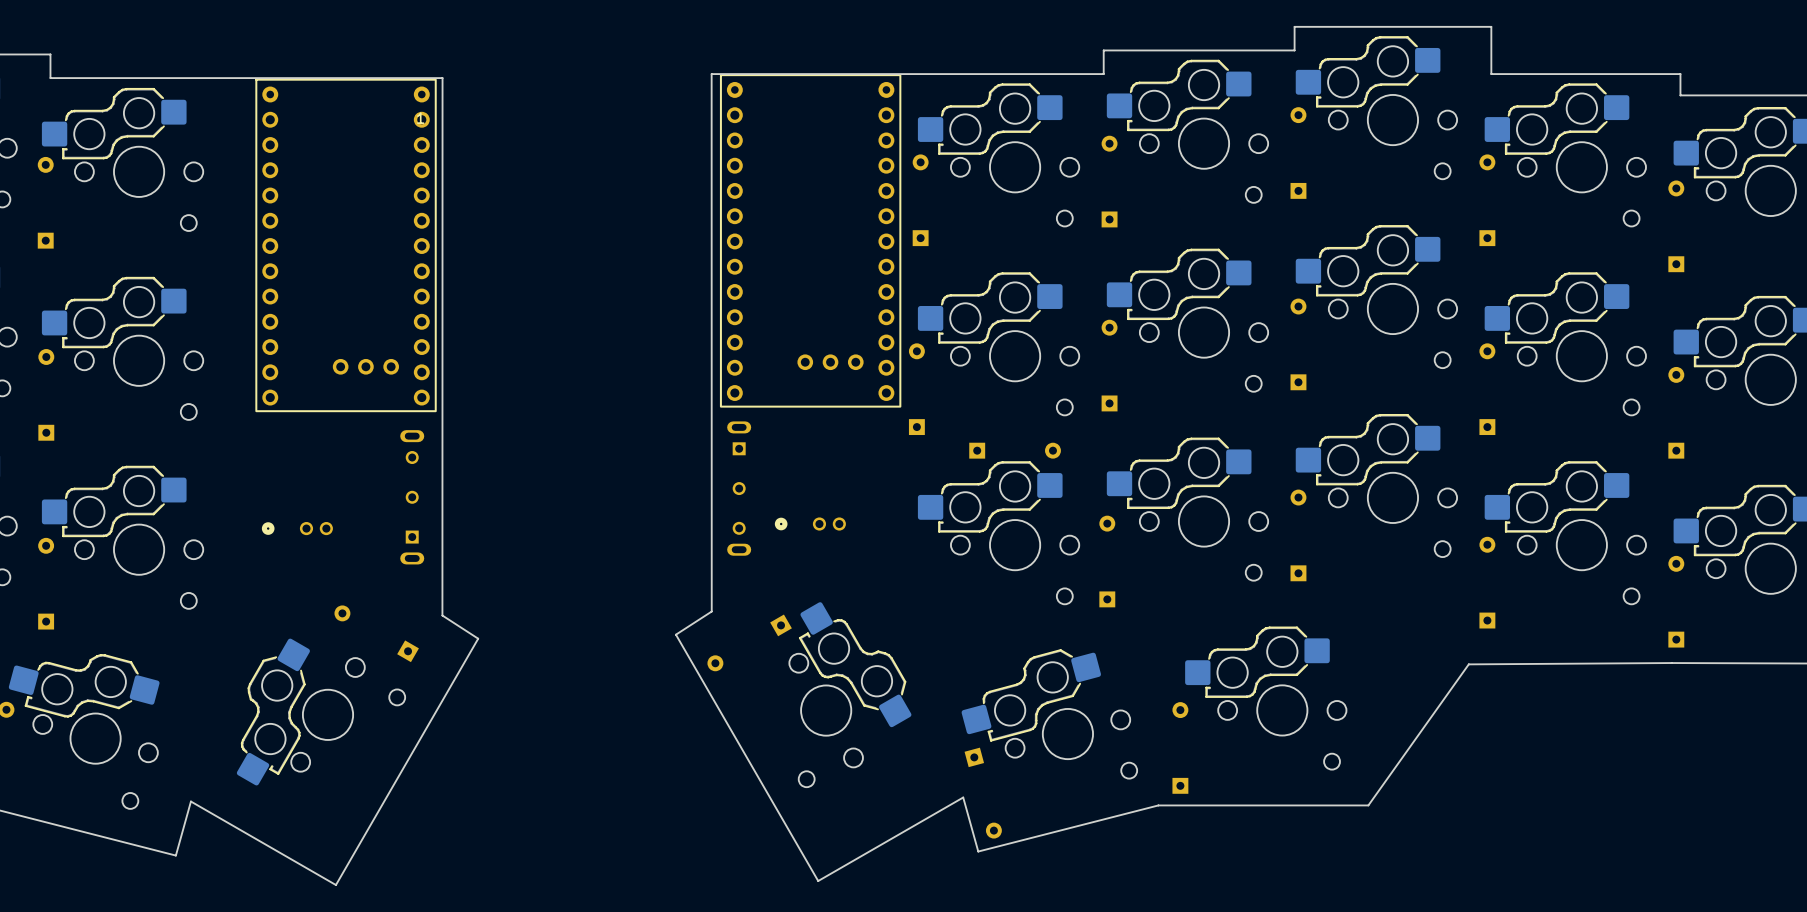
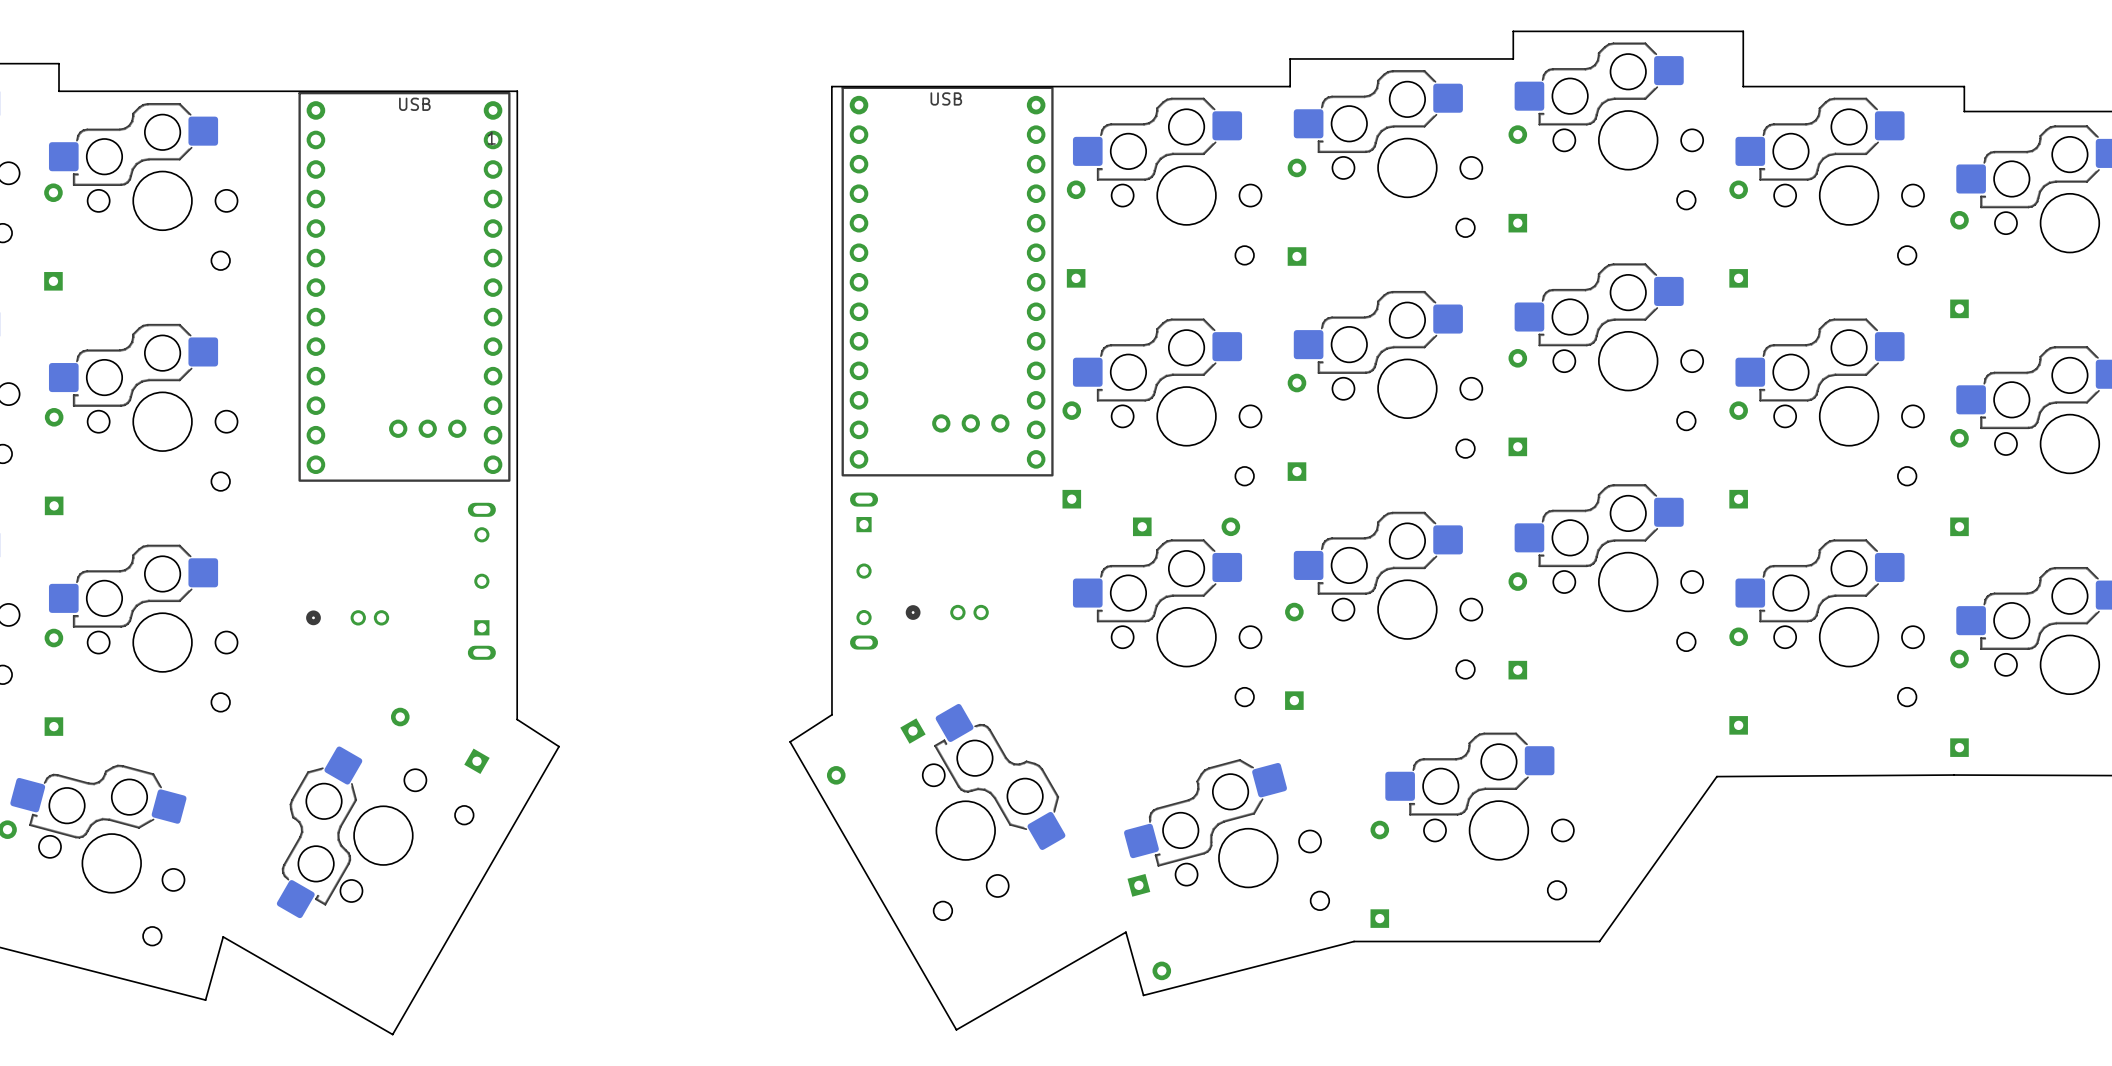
part text: none -> USB (946, 98)
part text: none -> USB (414, 104)

